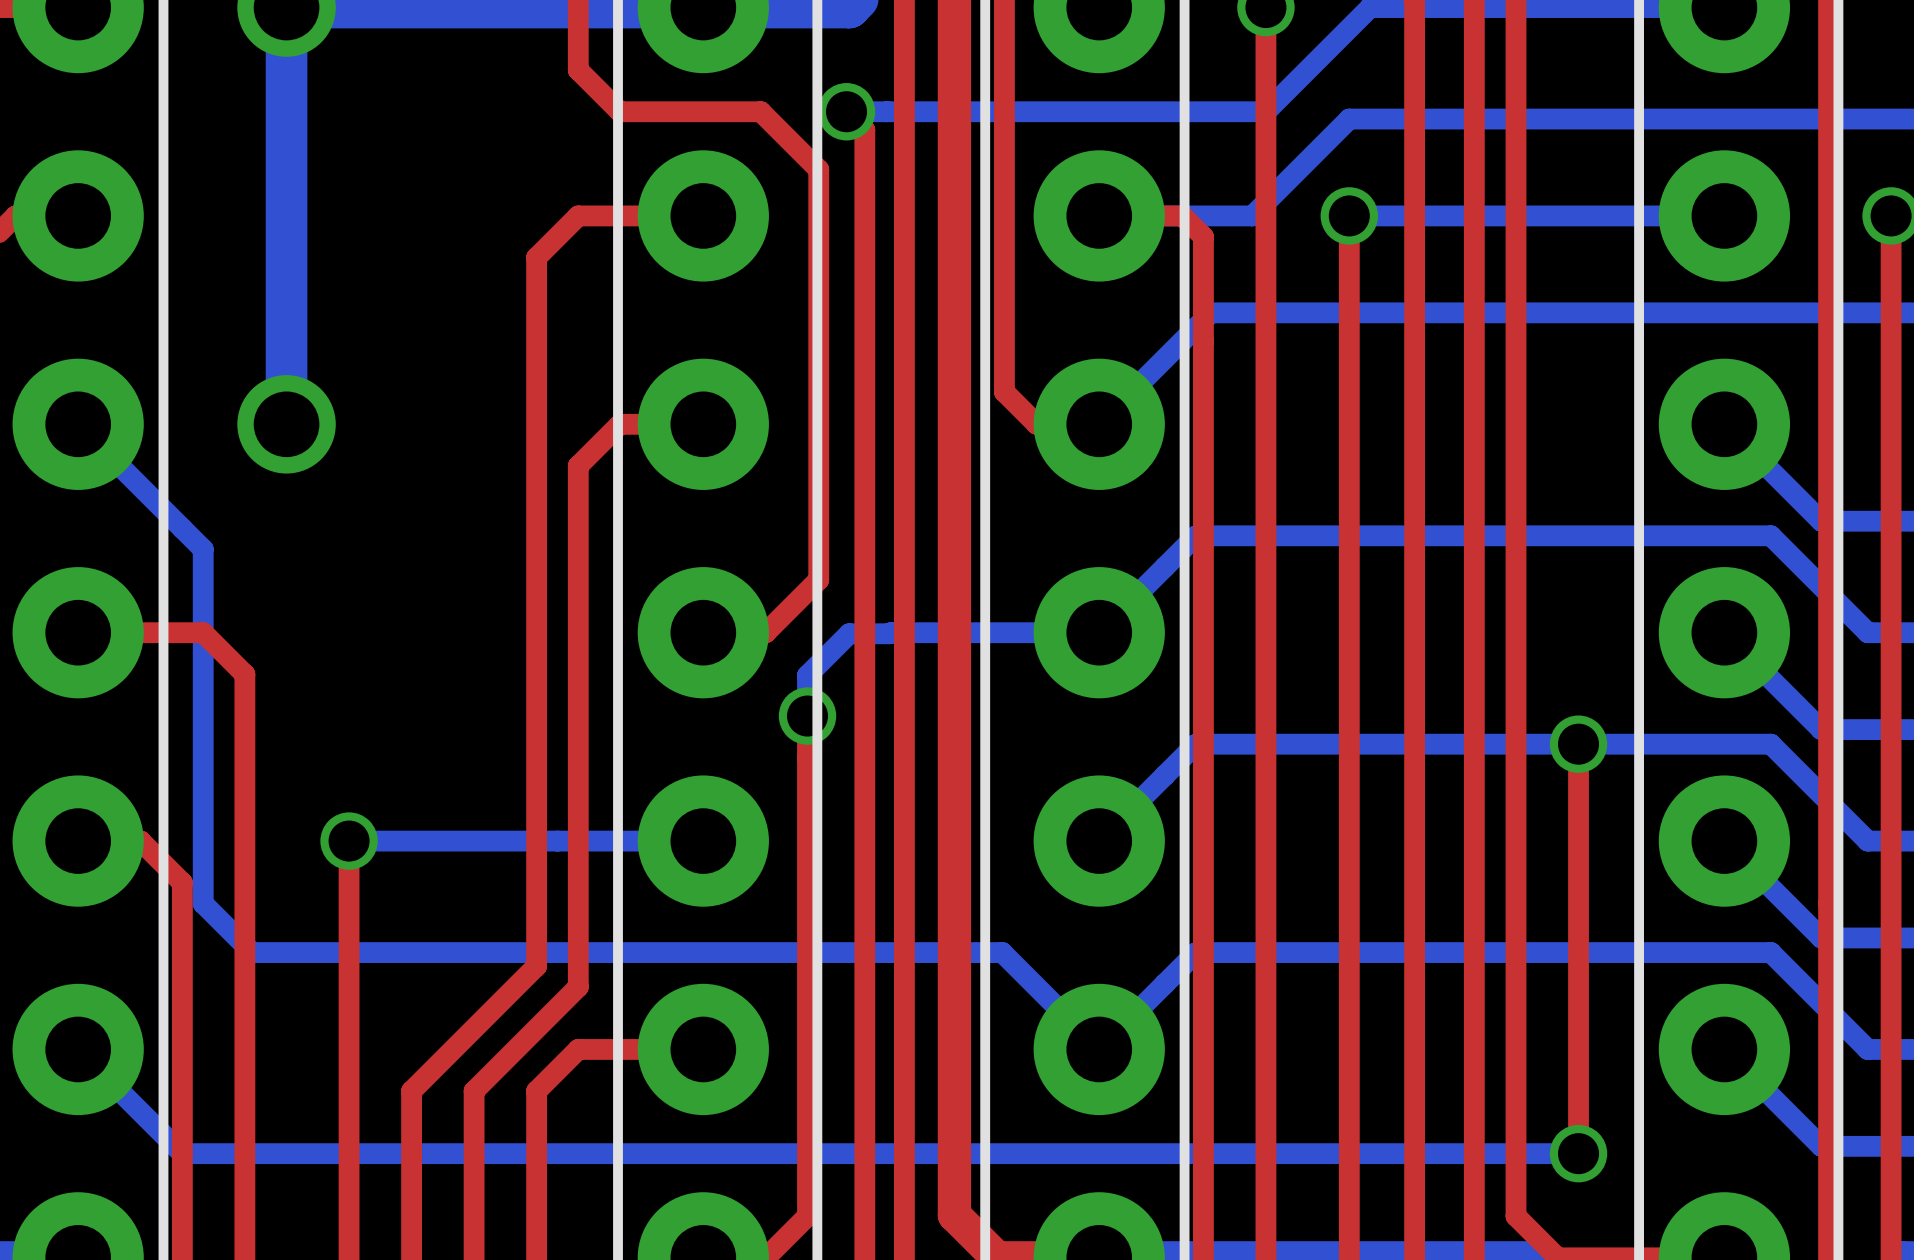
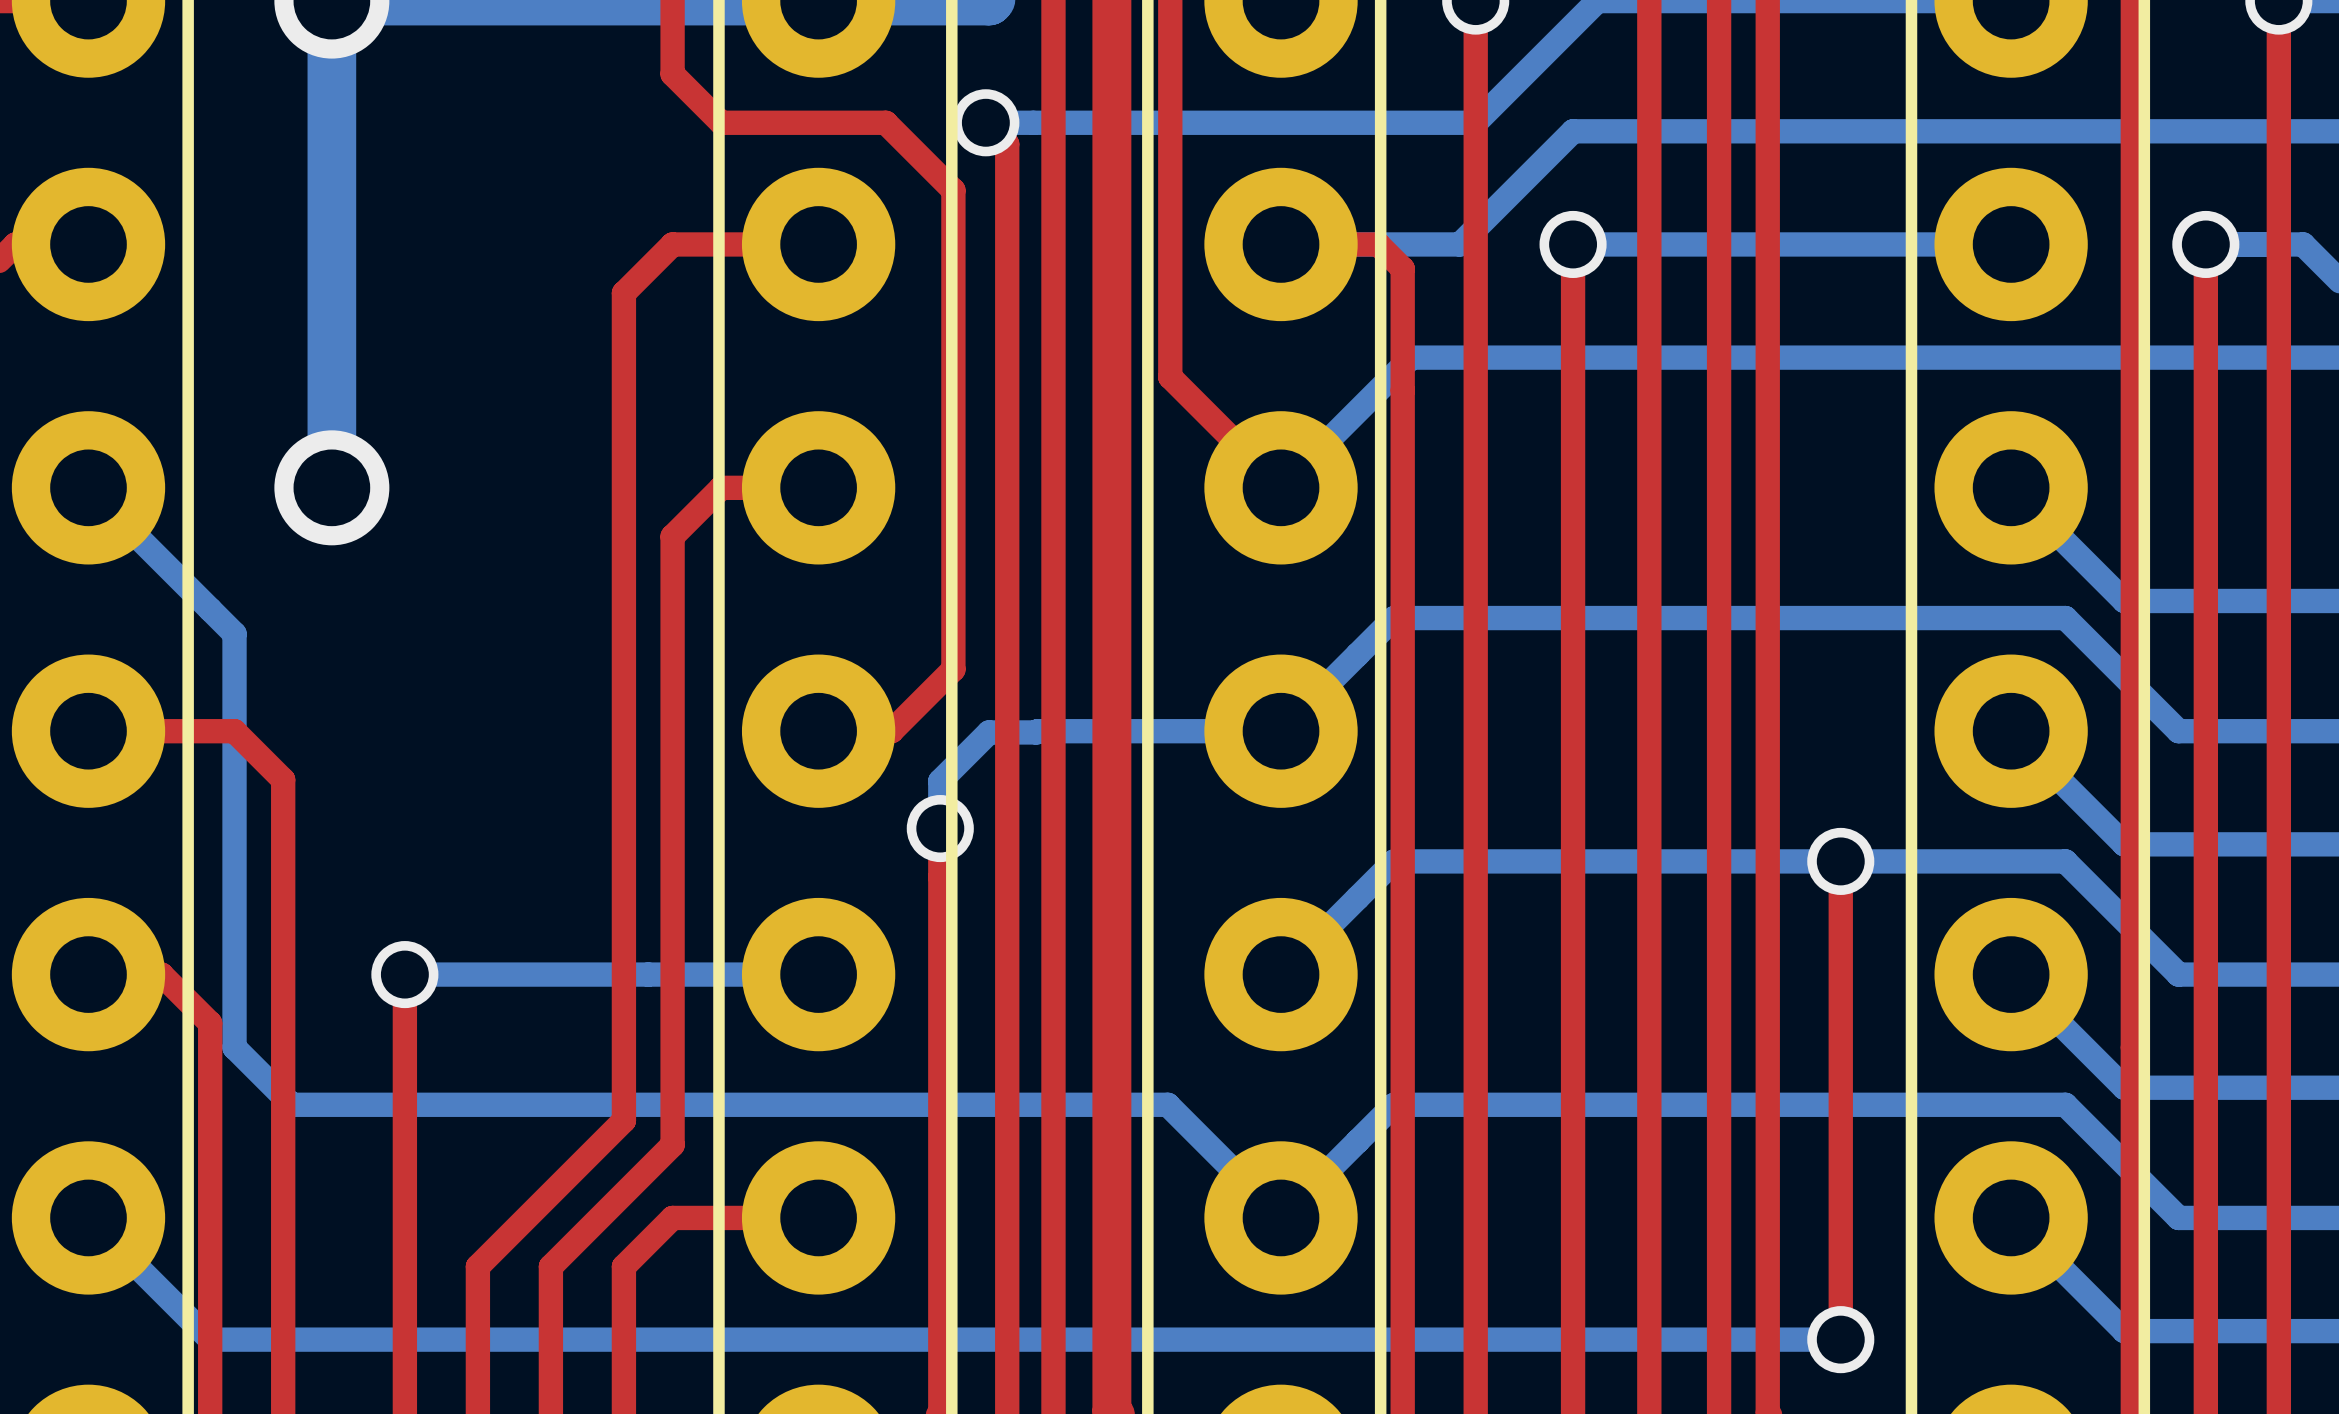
top track: (1004, 329) (1004, 392) (1036, 424) (1099, 424) -> (1170, 377) (1281, 487)

